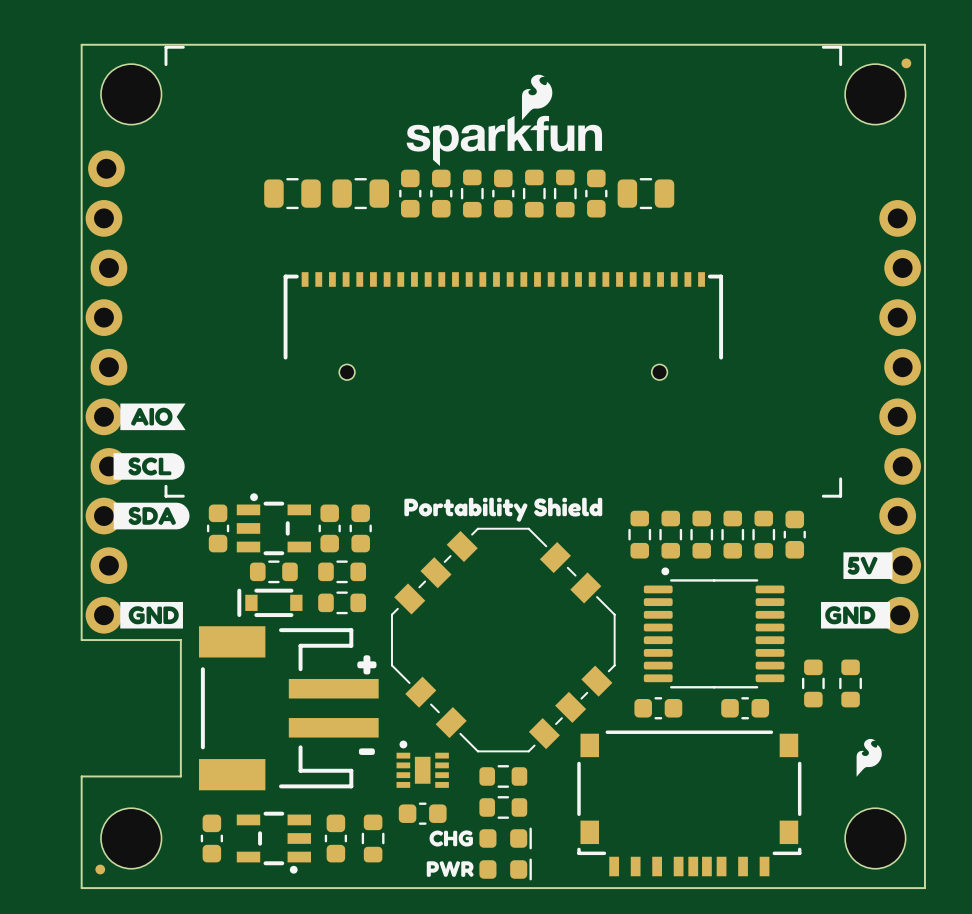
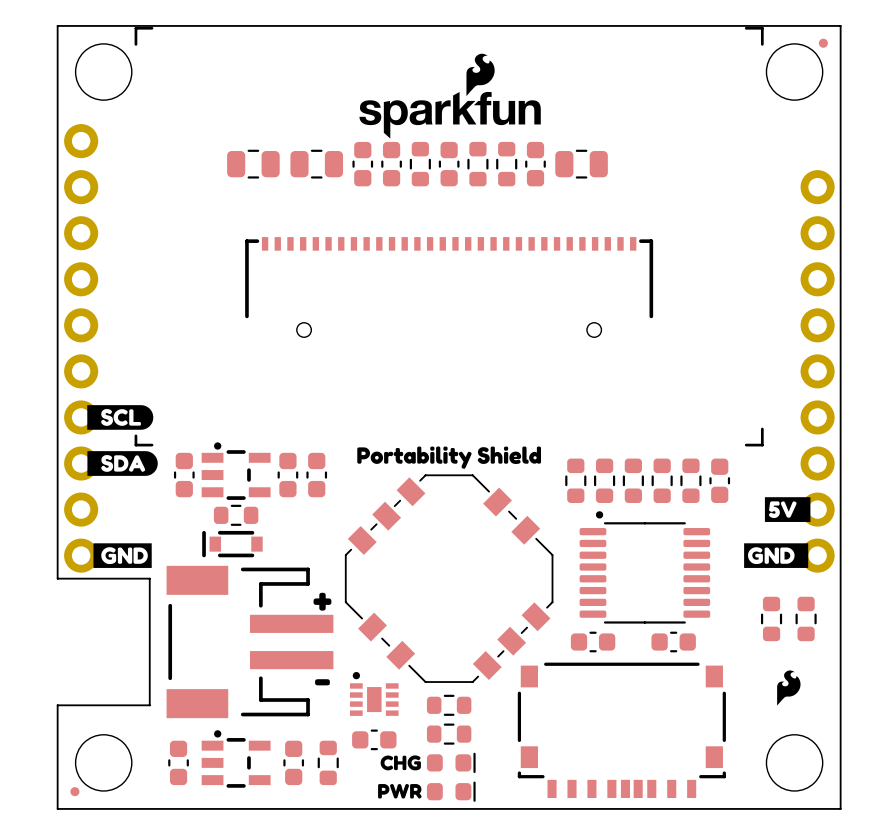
part: none -> (81, 256)
part: none -> (817, 256)
part: (106, 392) -> none
drawing: [120, 403, 186, 431] -> none
part: (900, 416) -> none
part: none -> (817, 463)
part: none -> (81, 486)
part: (342, 571) -> none
part: (342, 602) -> none
part position: (813, 683) -> (806, 618)
part rotation: 0° (273, 842) -> 180° (236, 759)

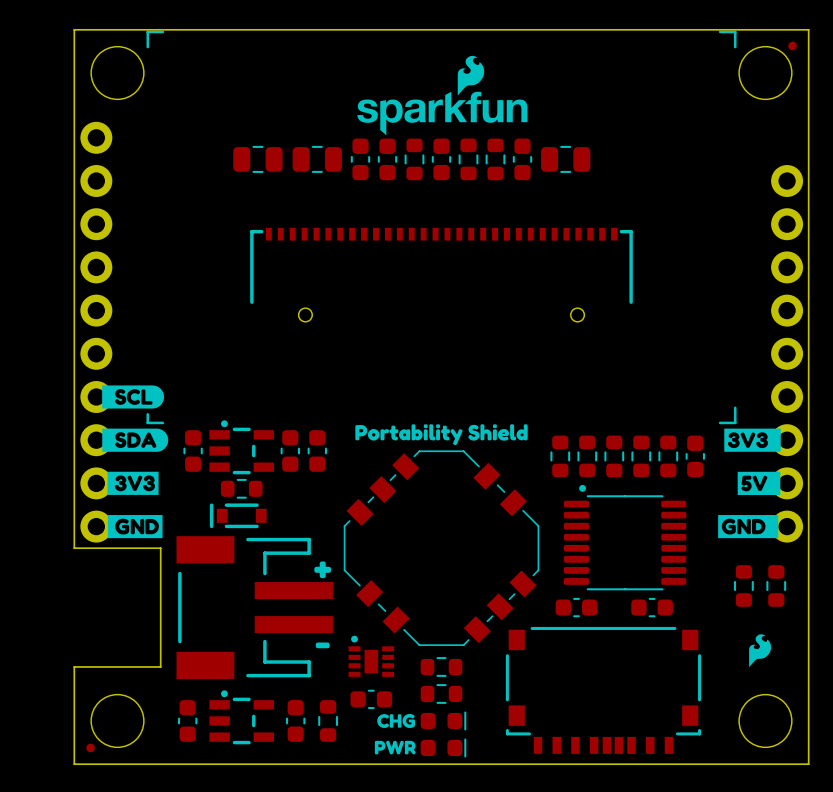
drawing: none -> [724, 428, 781, 452]
drawing: none -> [107, 471, 159, 495]

